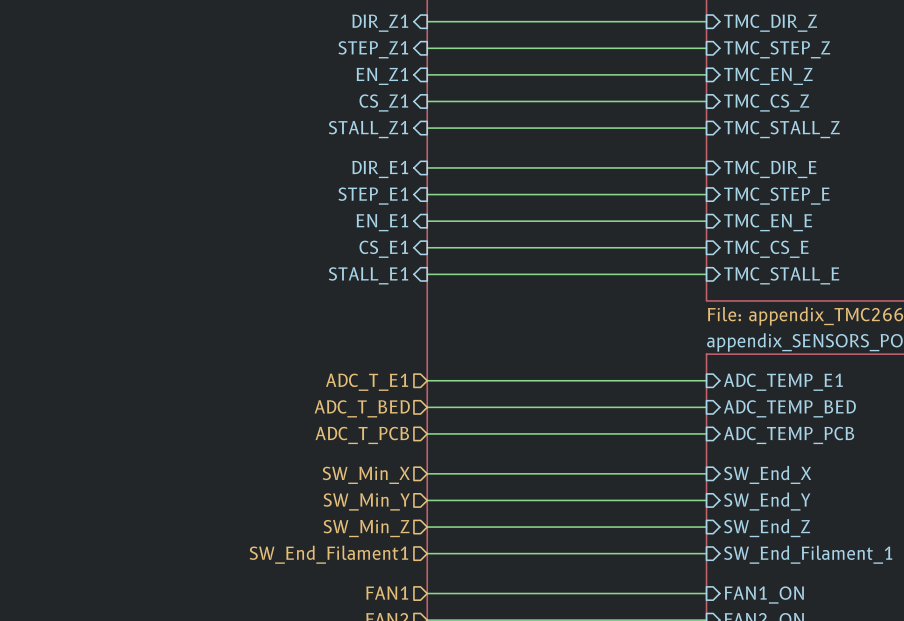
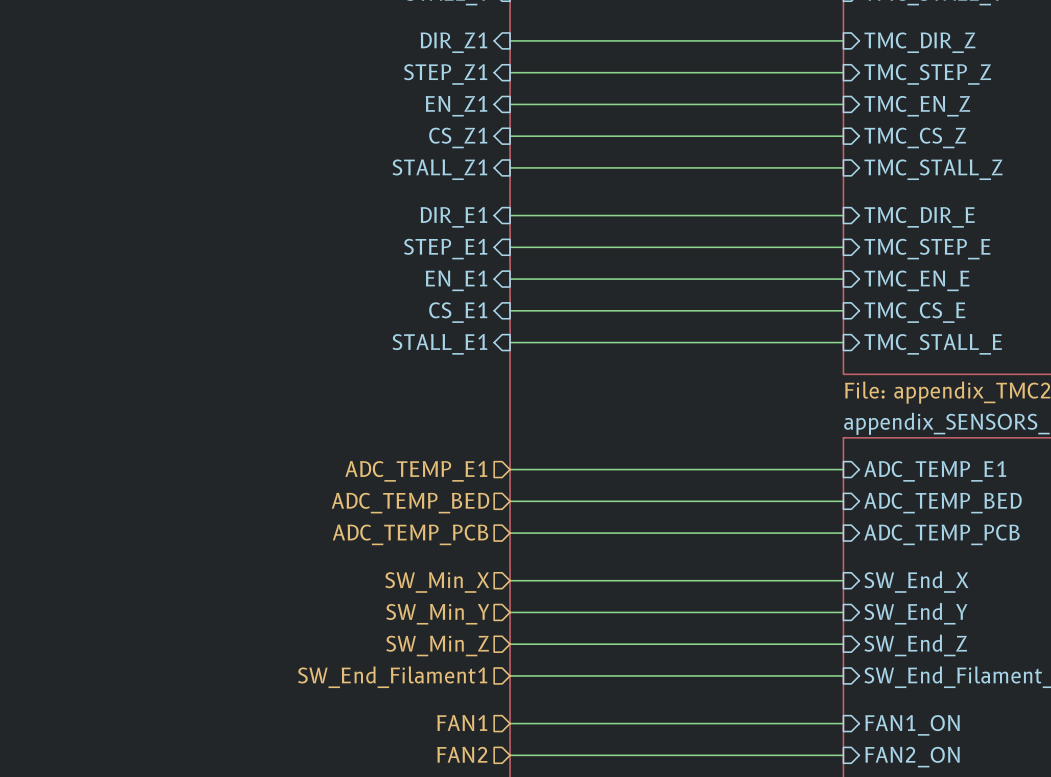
hierarchical label: ADC_T_E1 (367, 382) -> ADC_TEMP_E1 (416, 471)
hierarchical label: ADC_T_BED (362, 408) -> ADC_TEMP_BED (410, 503)
hierarchical label: ADC_T_PCB (362, 435) -> ADC_TEMP_PCB (410, 534)

